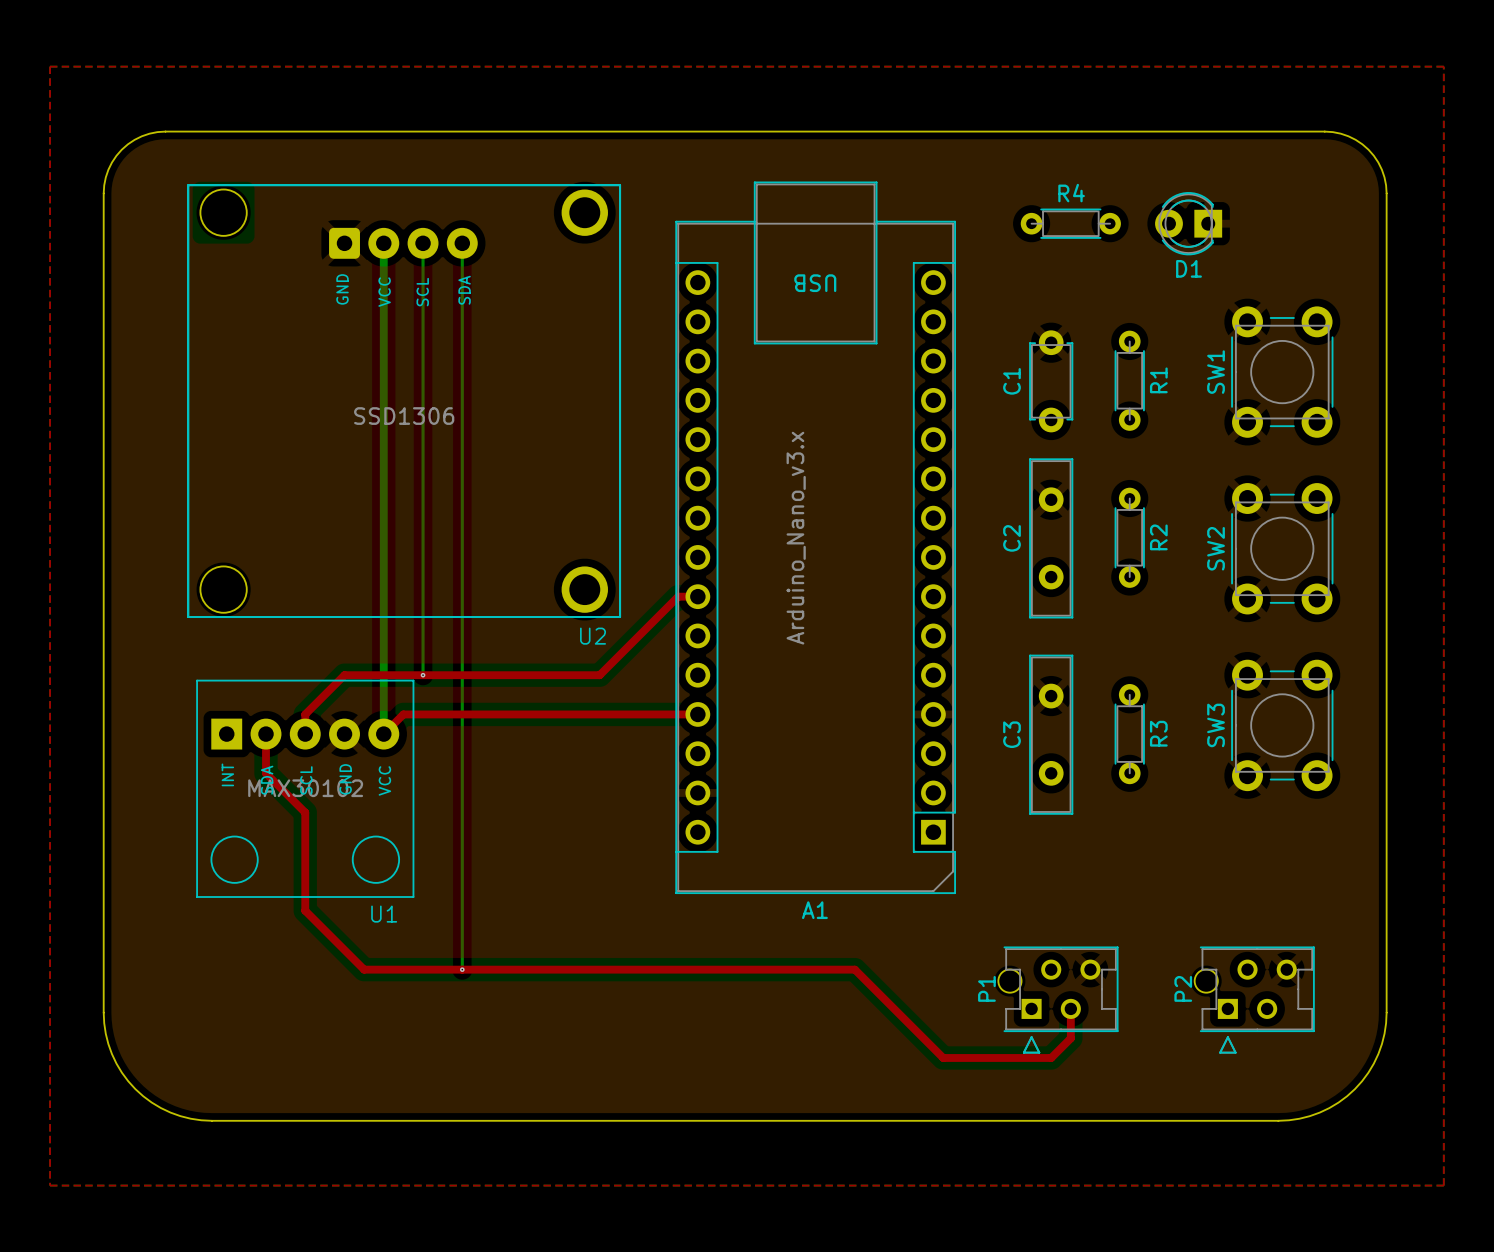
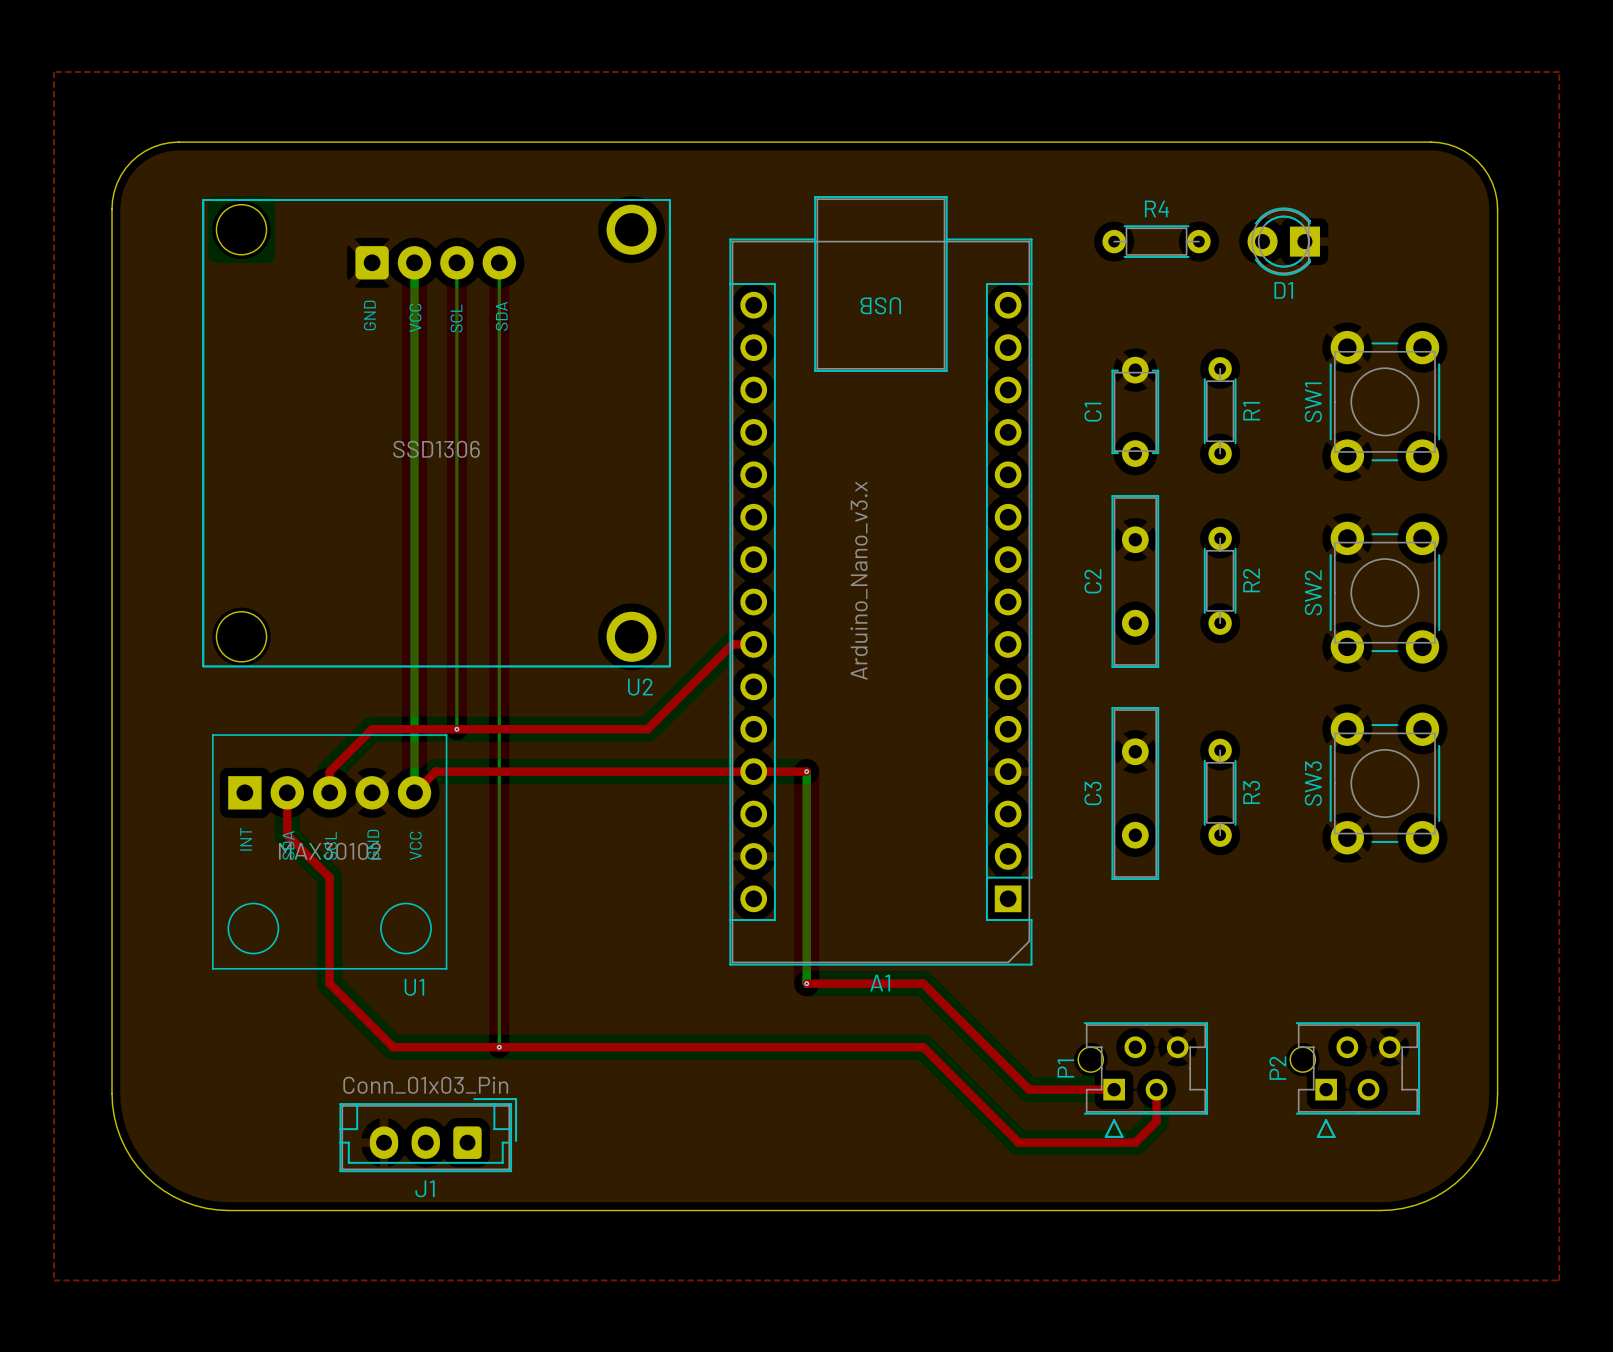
top track: none -> (753, 771) (806, 771)
bottom track: none -> (806, 771) (806, 983)
via: none -> (806, 771)
top track: none -> (806, 983) (923, 983) (1029, 1089) (1114, 1089)
via: none -> (806, 983)
J1: none -> Conn_01x03_Pin (428, 1135)

